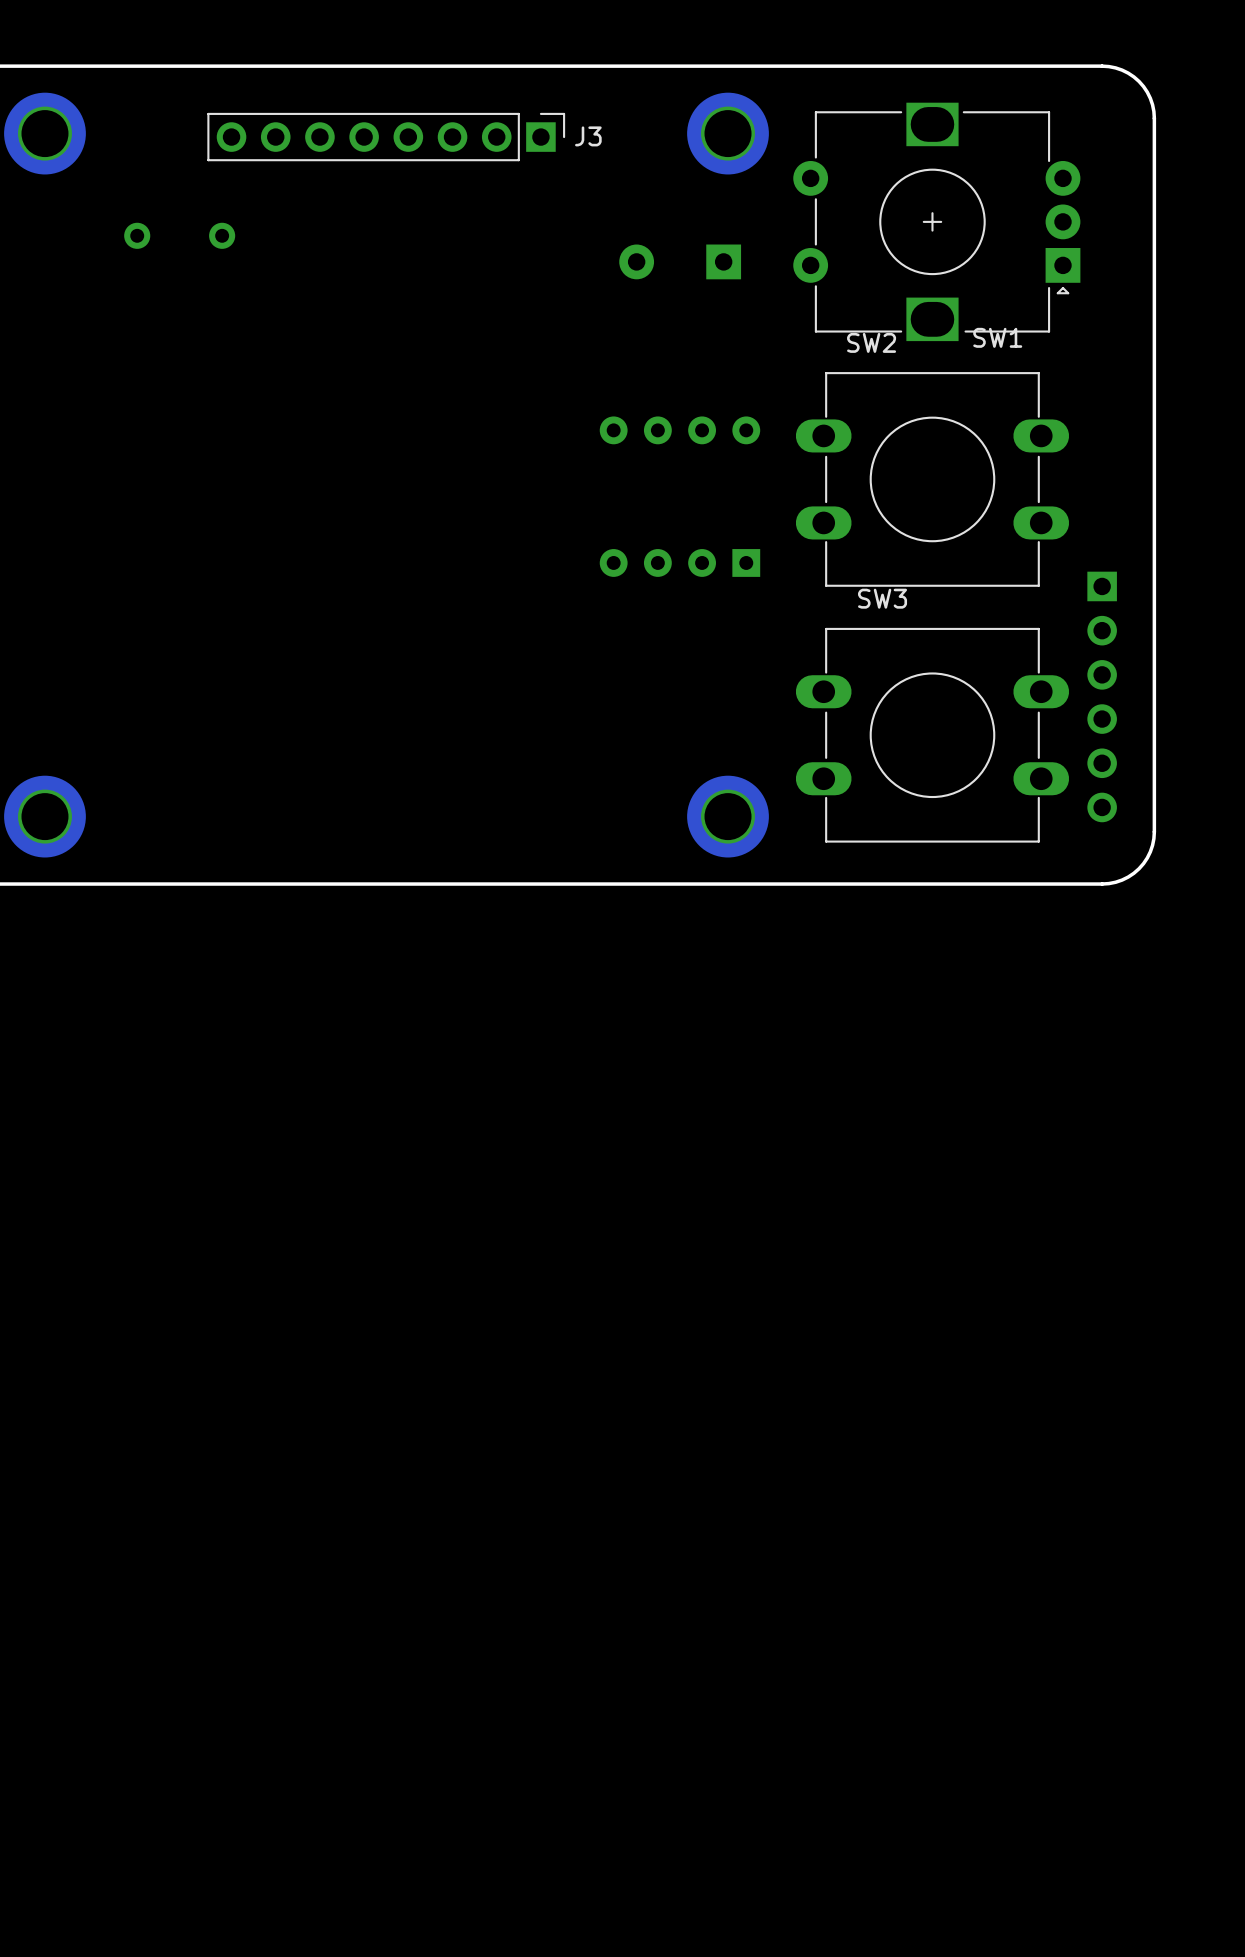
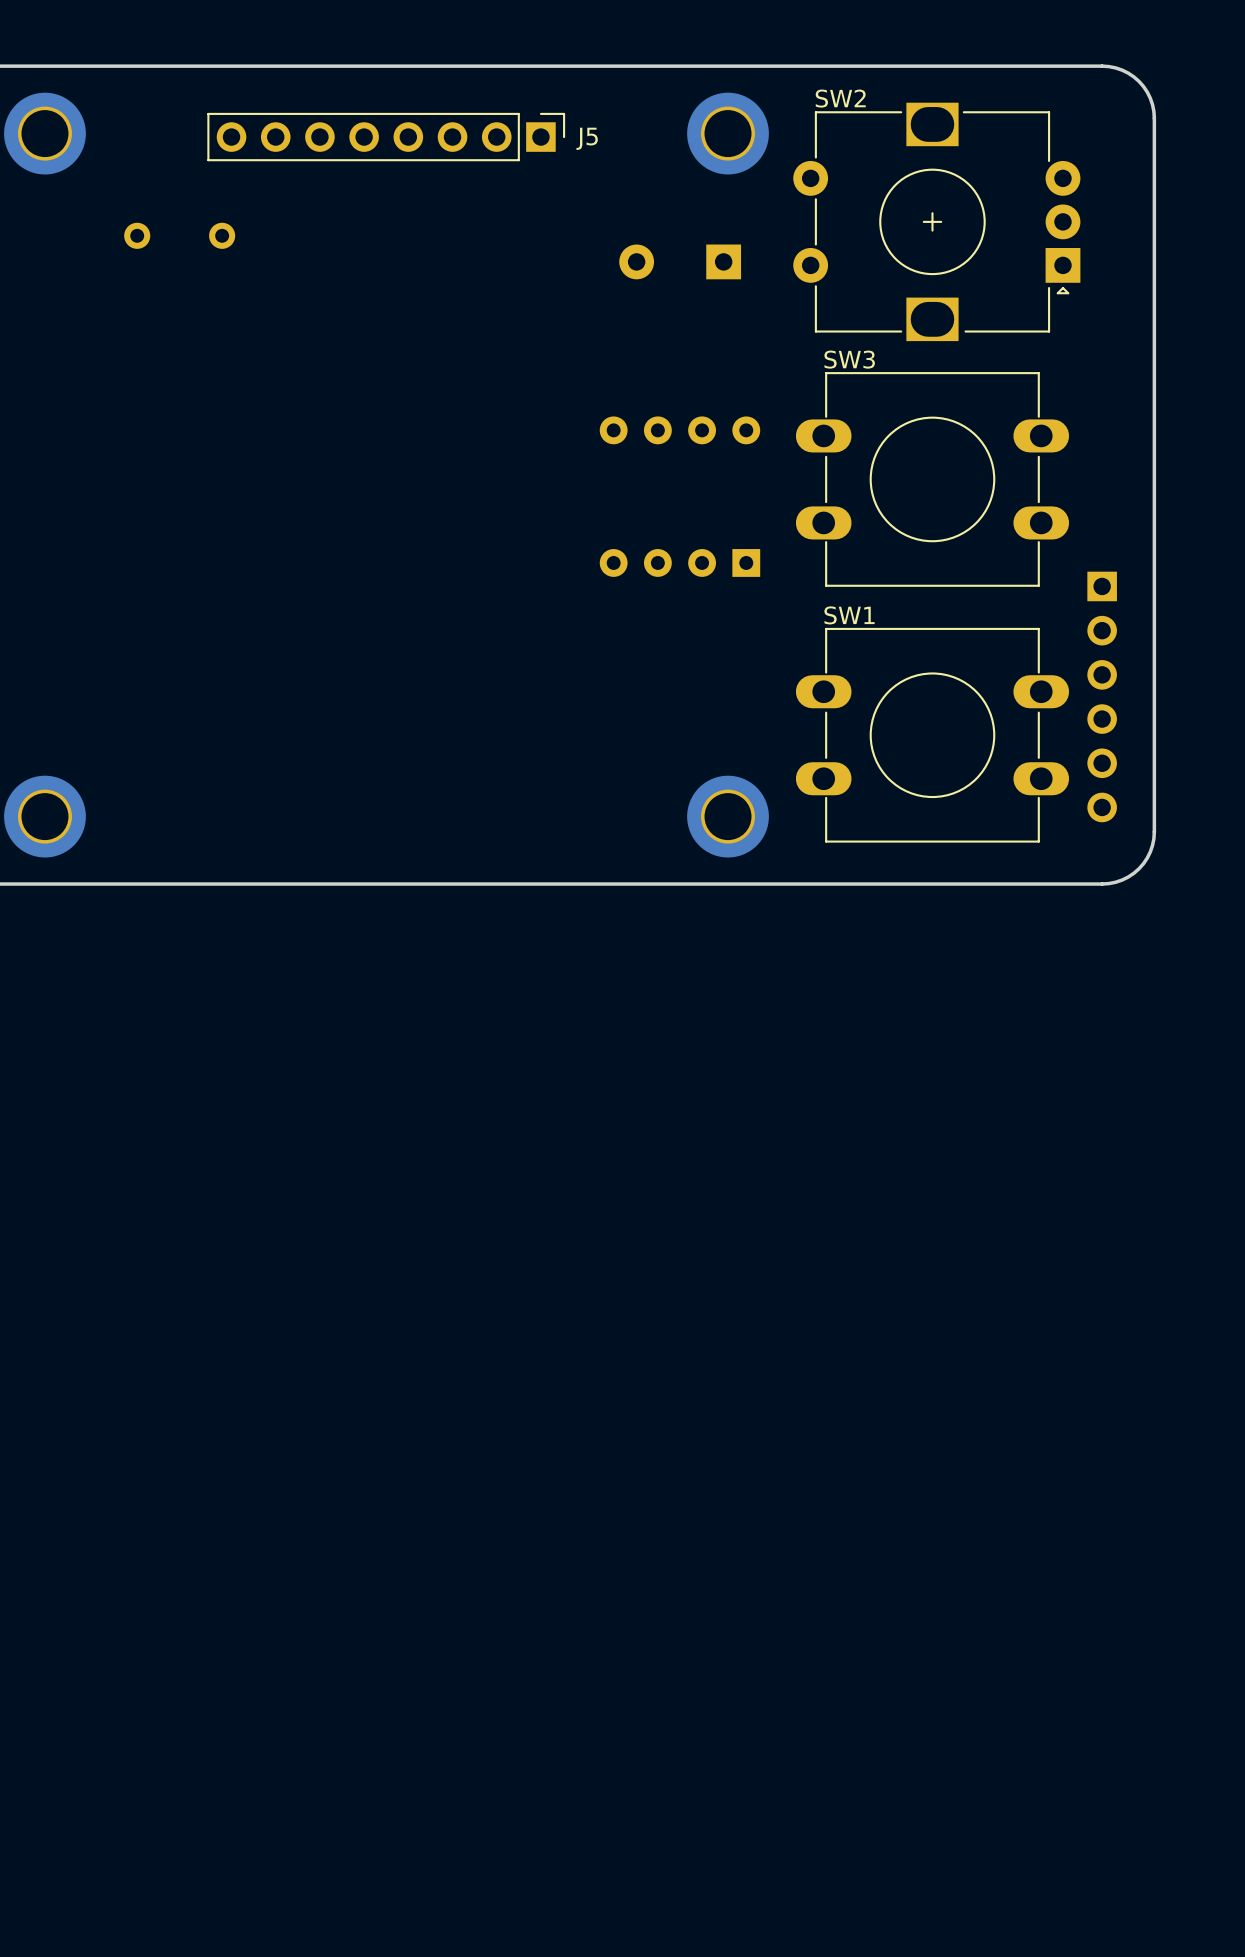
J3 name: J3 (588, 136) -> J5 (587, 138)
SW1 name: SW1 (997, 337) -> SW2 (840, 98)
SW2 name: SW2 (871, 342) -> SW3 (849, 359)
SW3 name: SW3 (882, 598) -> SW1 (849, 615)

